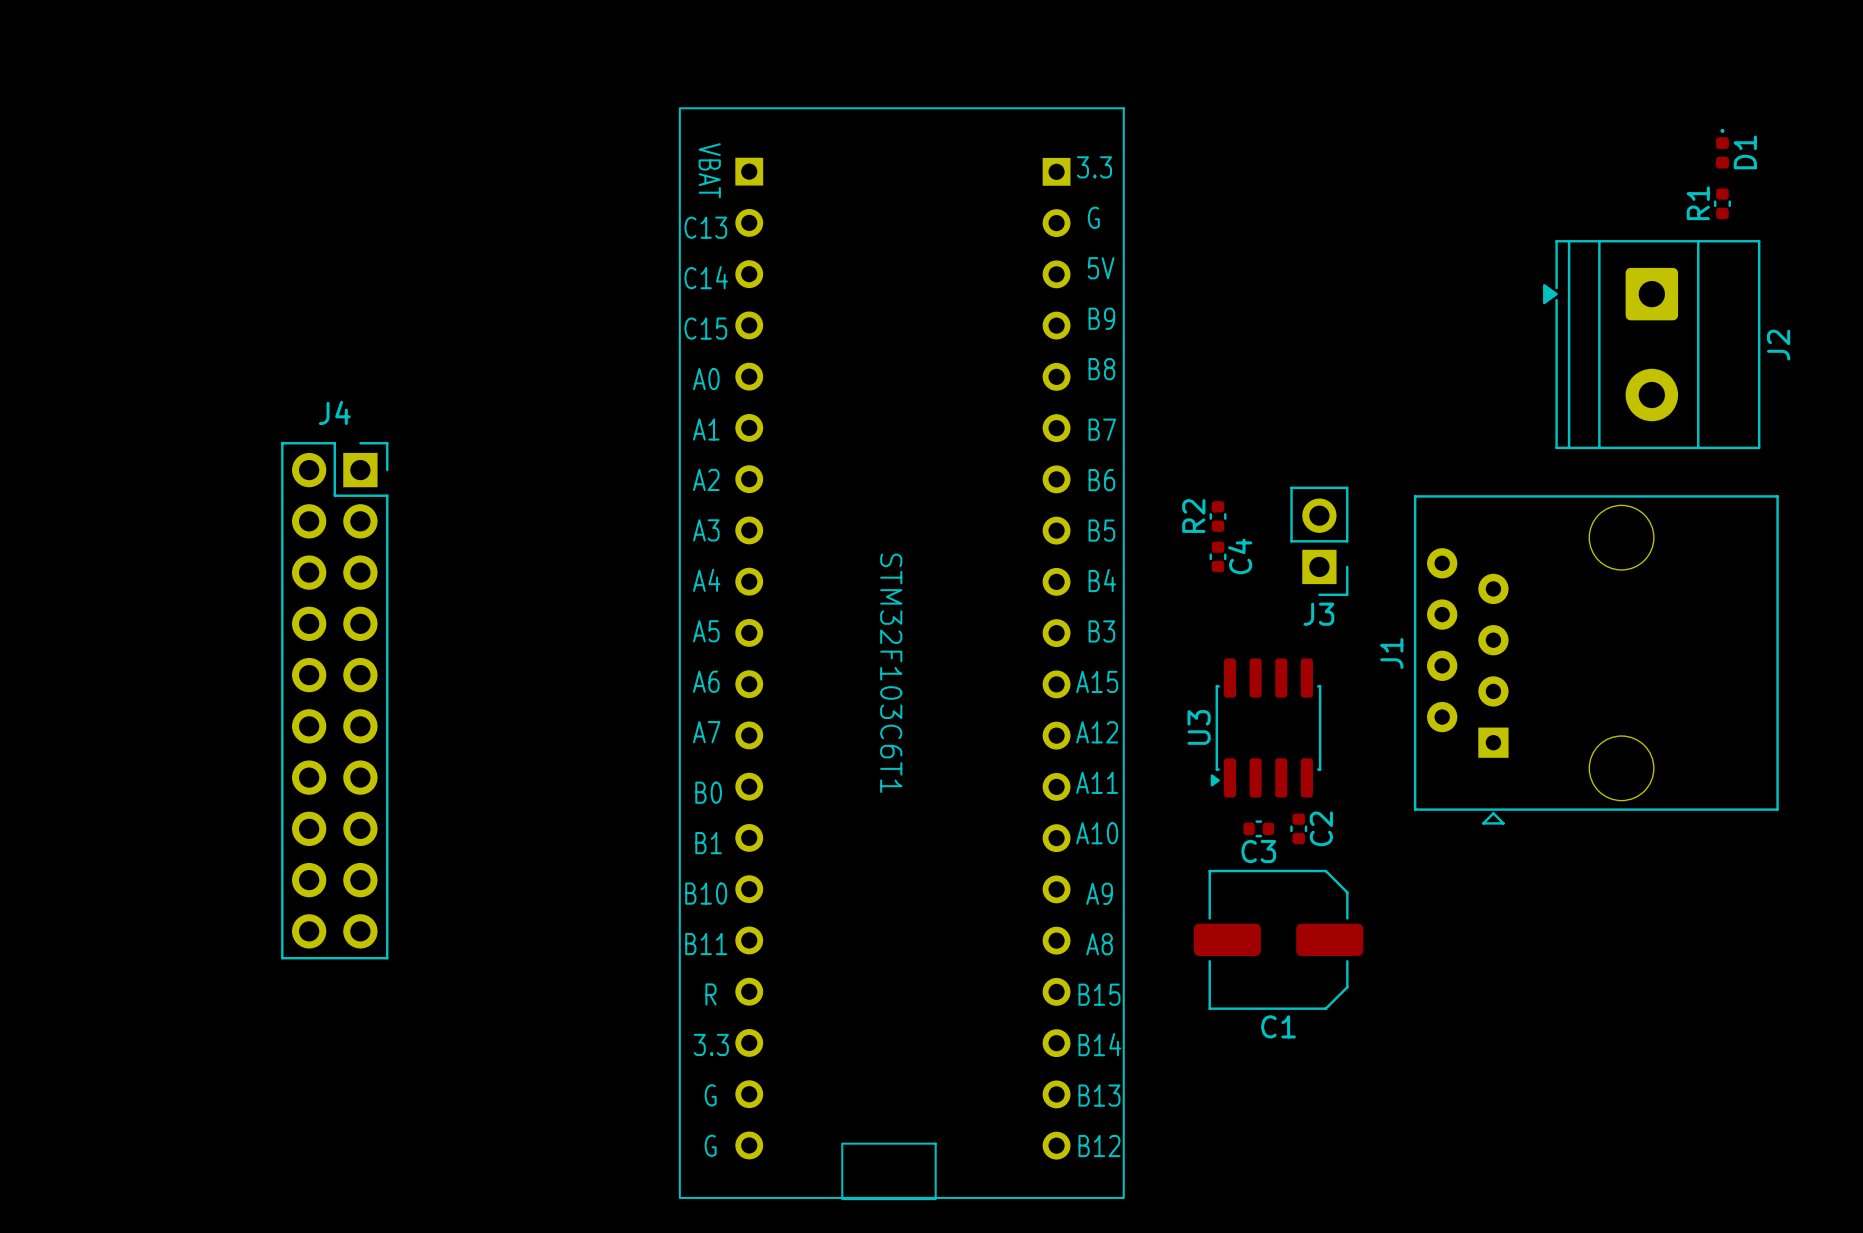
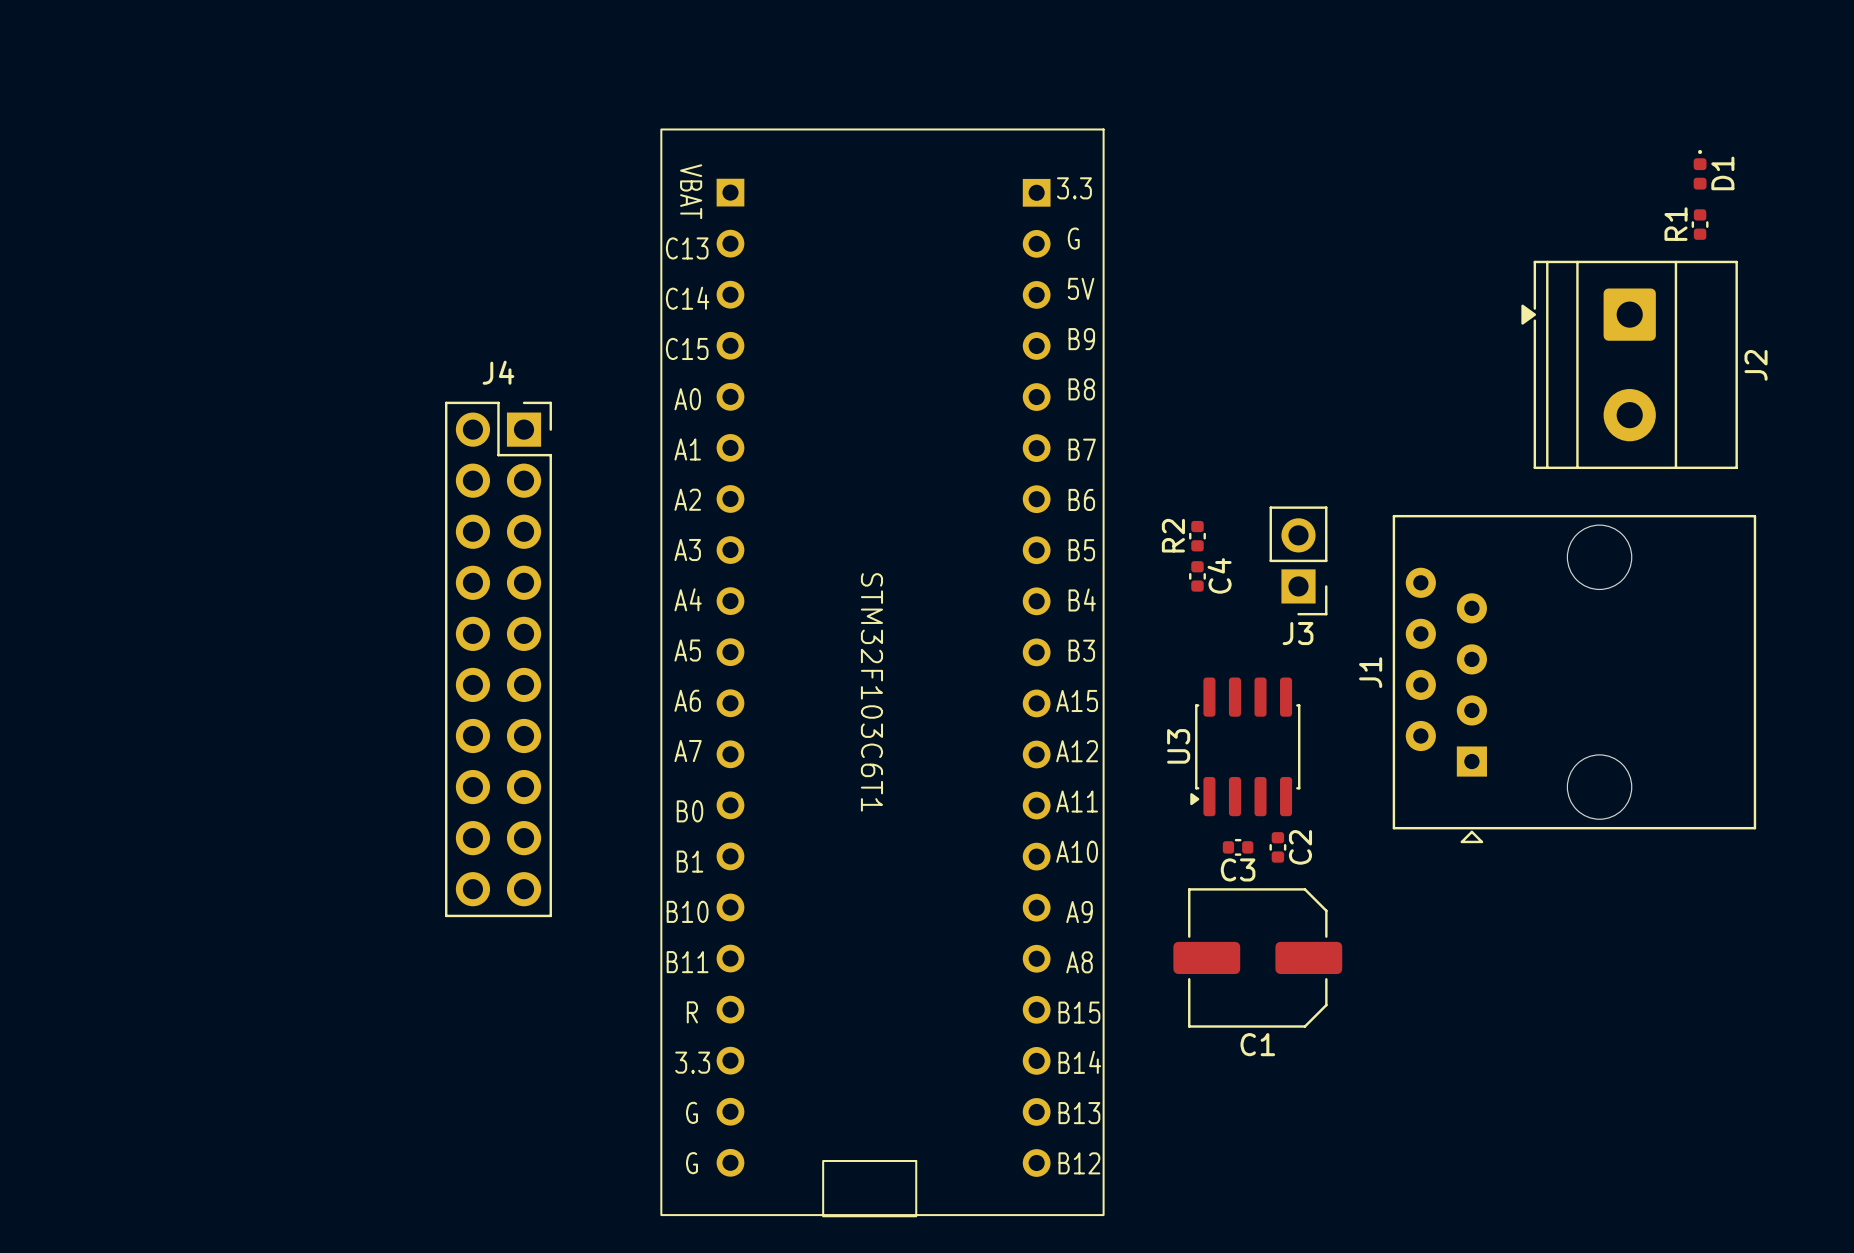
J4 position: (334, 700) -> (498, 659)

